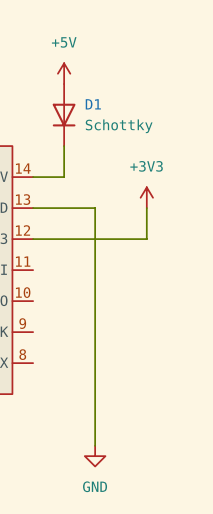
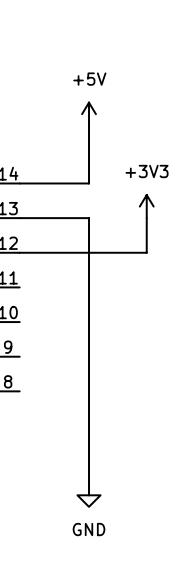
power symbol position: +5V (64, 73) -> +5V (89, 114)
D1: Schottky (64, 115) -> none
wire: (64, 146) (64, 177) -> (89, 125) (89, 183) (54, 183)

